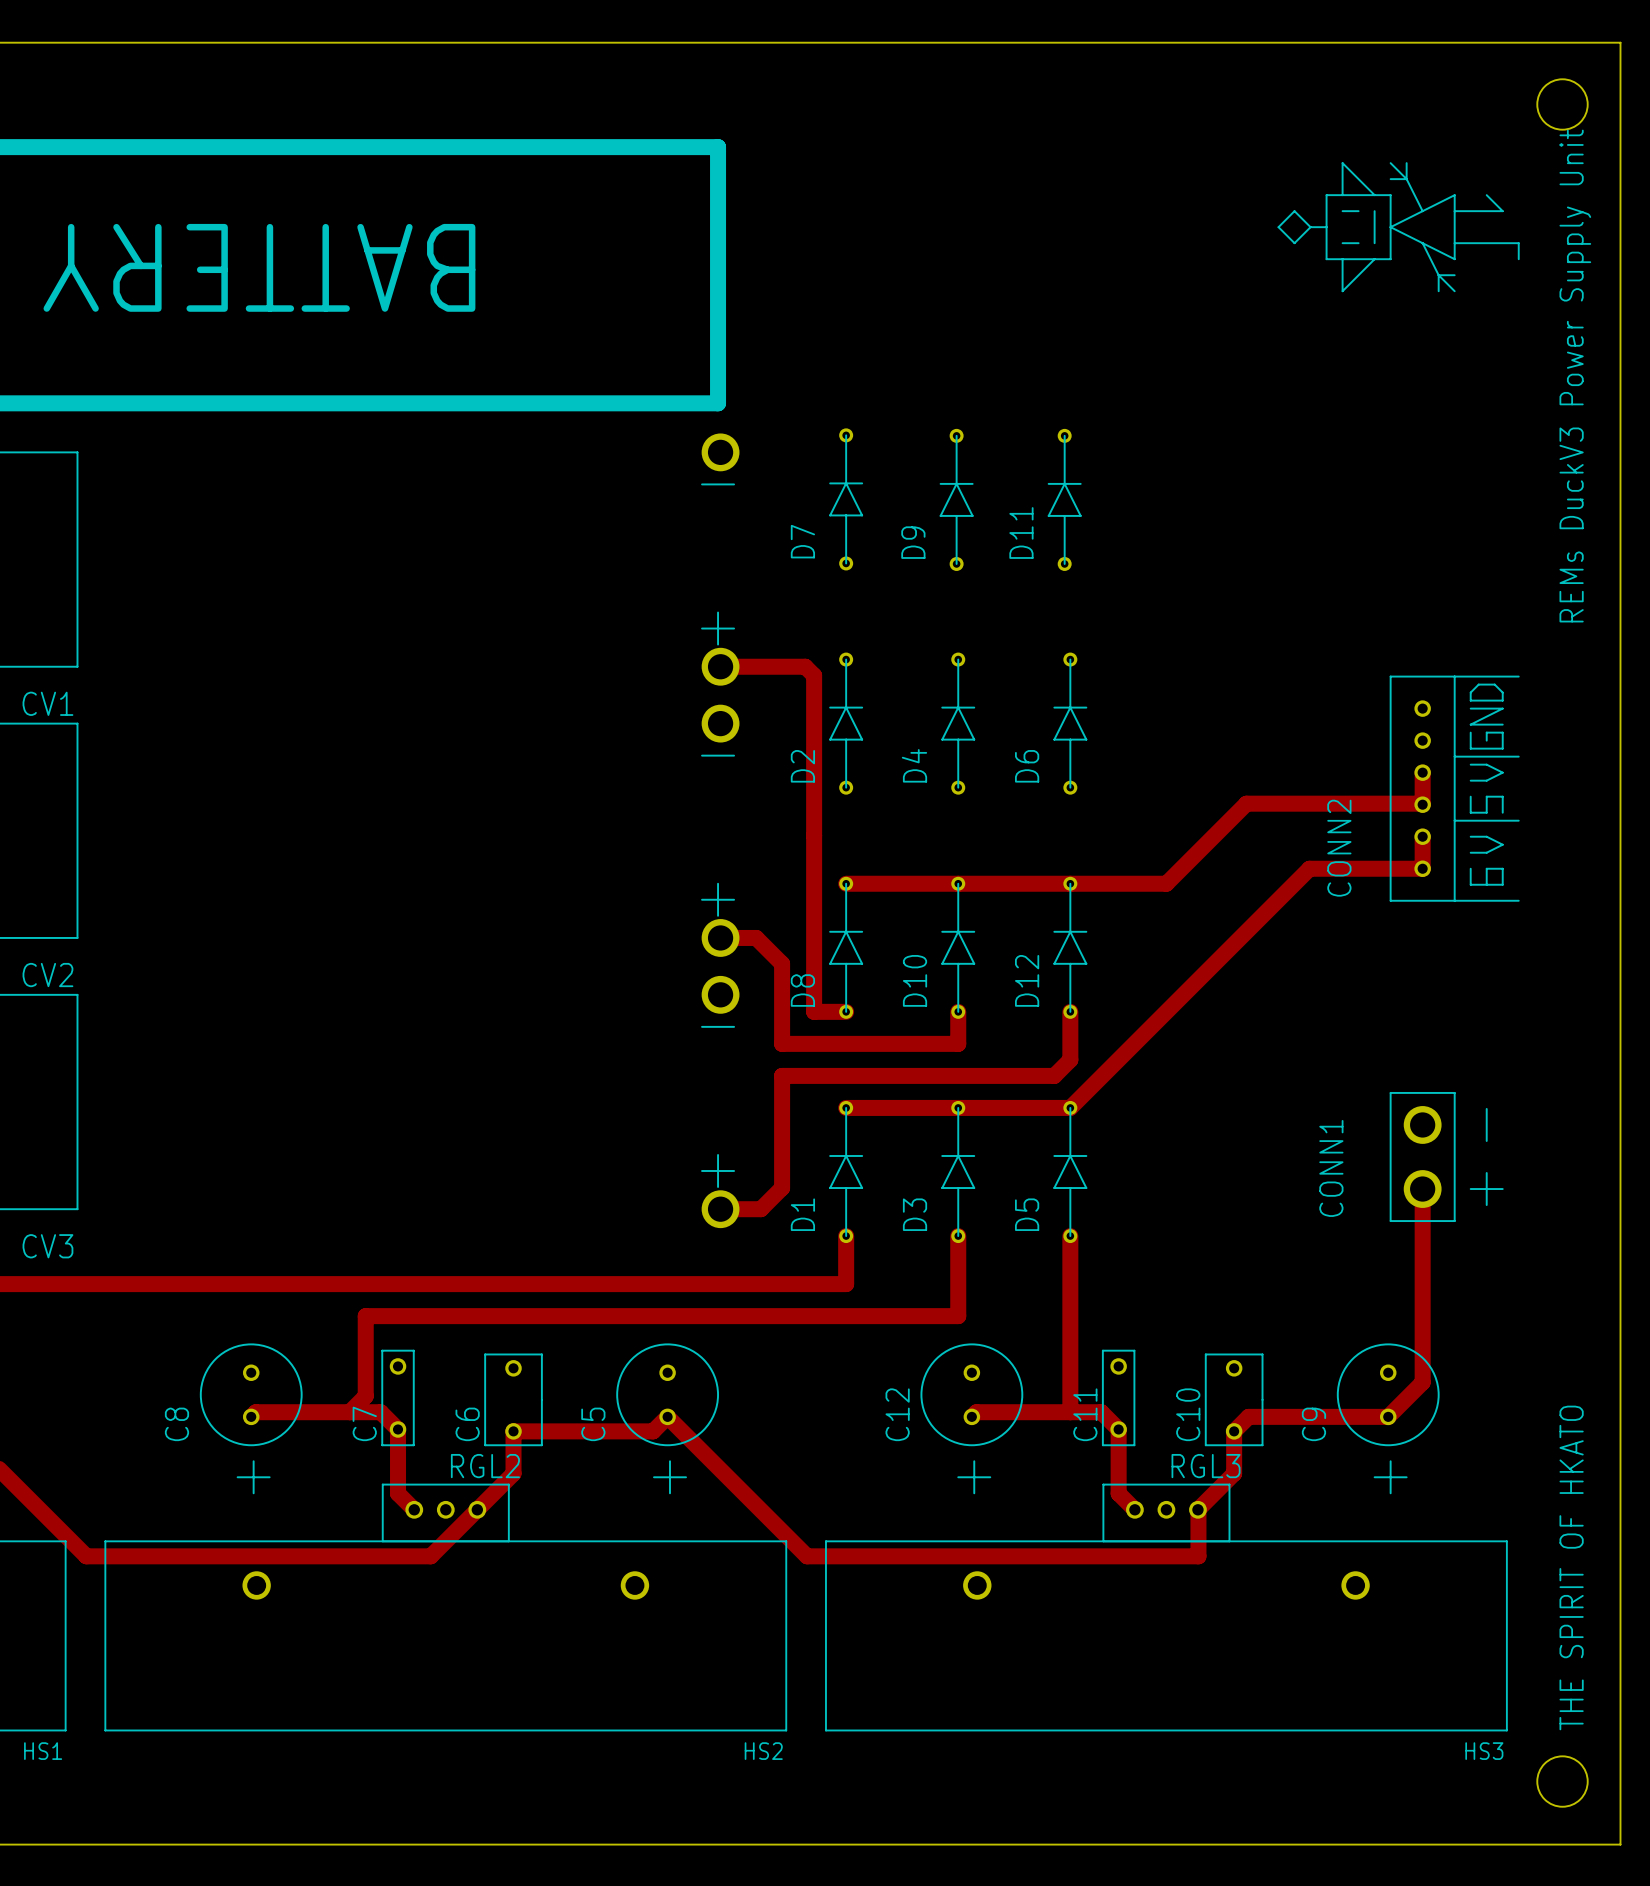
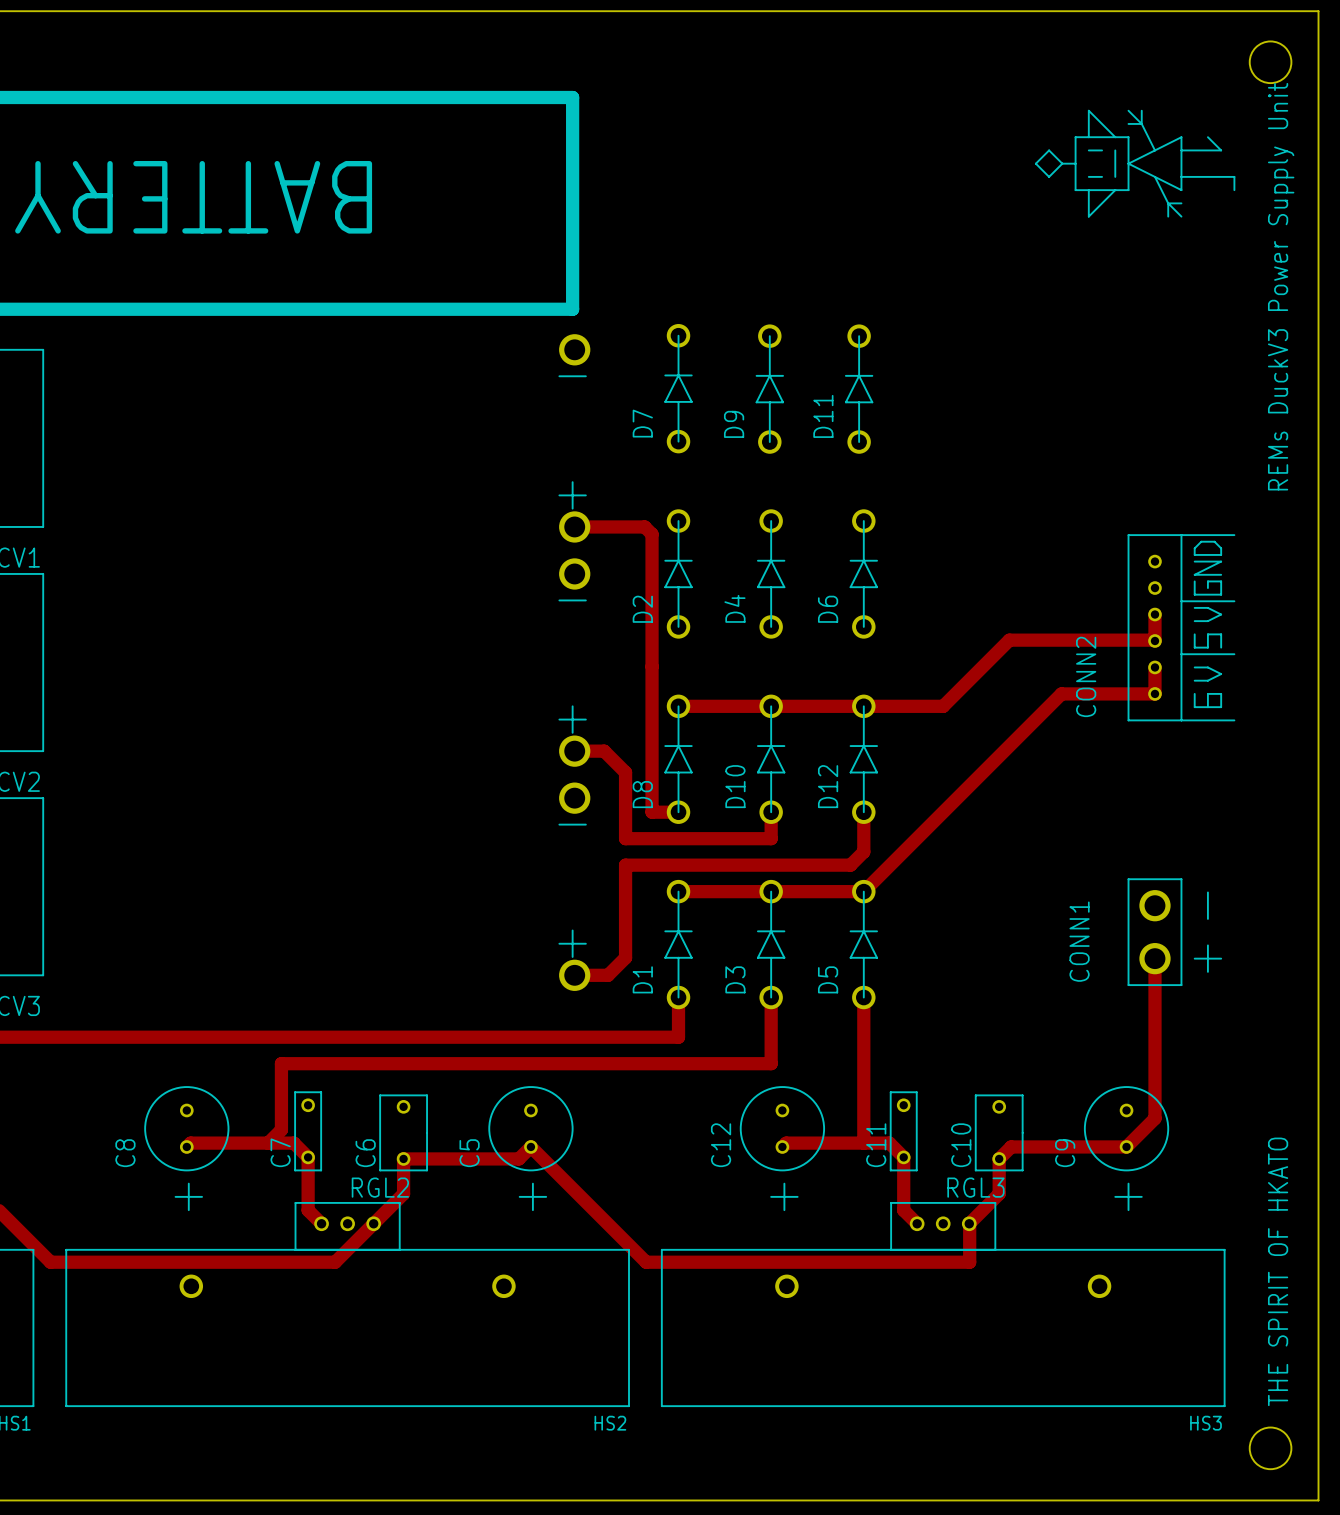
D7 footprint: [829, 428, 864, 571] -> [664, 324, 693, 454]
D9 footprint: [939, 428, 974, 571] -> [755, 324, 784, 454]
D11 footprint: [1047, 428, 1082, 571] -> [845, 324, 874, 454]
D2 footprint: [829, 652, 864, 795] -> [664, 509, 693, 639]
D4 footprint: [941, 652, 976, 795] -> [757, 509, 786, 639]
D6 footprint: [1053, 652, 1088, 795] -> [849, 509, 878, 639]
D8 footprint: [829, 876, 864, 1019] -> [664, 694, 693, 824]
D10 footprint: [941, 876, 976, 1019] -> [757, 694, 786, 824]
D12 footprint: [1053, 876, 1088, 1019] -> [849, 694, 878, 824]
D1 footprint: [829, 1100, 864, 1244] -> [664, 879, 693, 1010]
D3 footprint: [941, 1100, 976, 1244] -> [757, 879, 786, 1010]
D5 footprint: [1053, 1100, 1088, 1244] -> [849, 879, 878, 1010]

